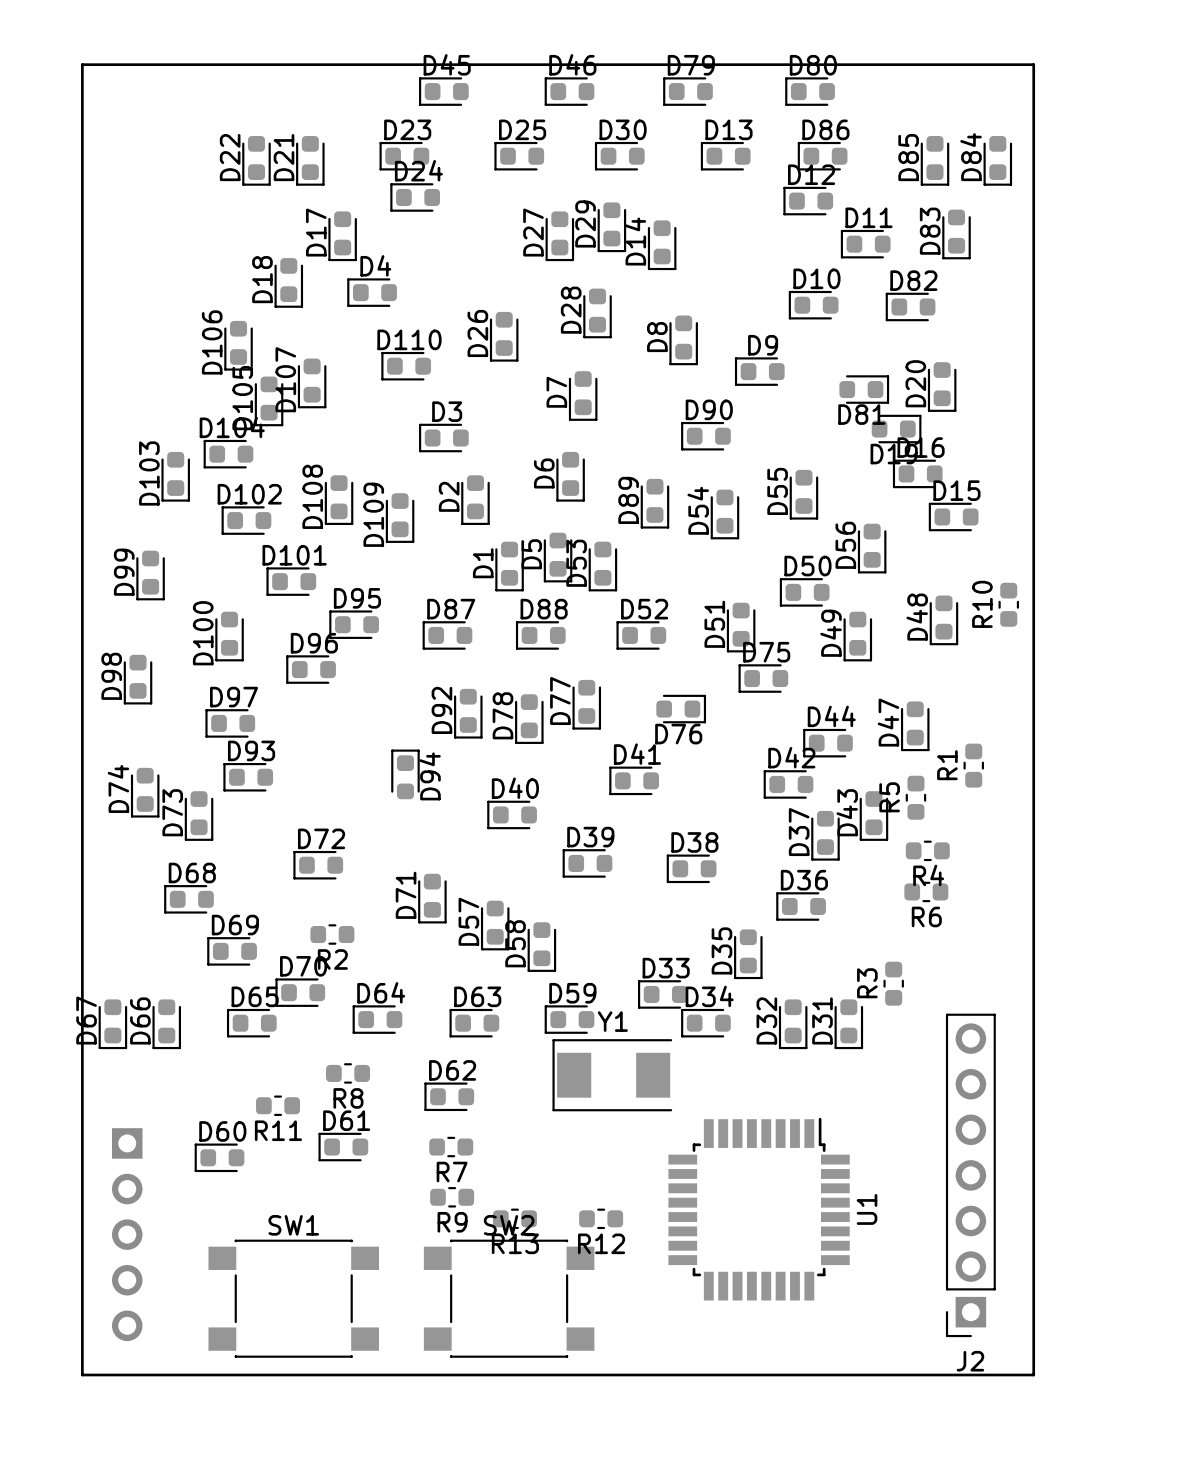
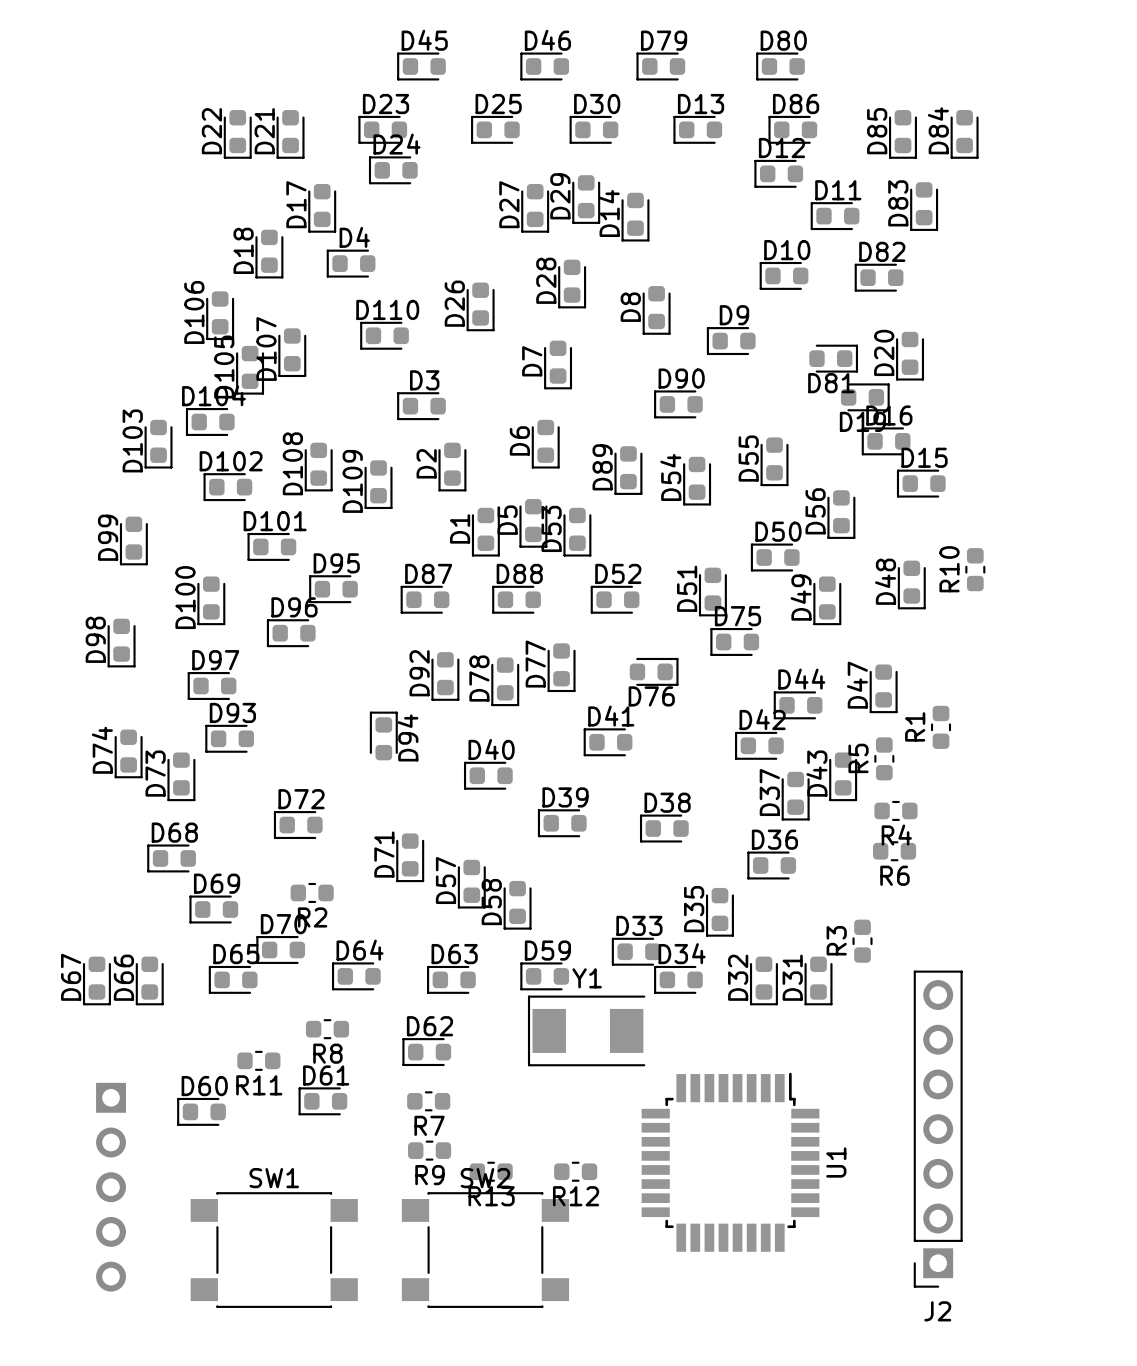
board edge: (82, 64) (1033, 64) (1033, 1374) (82, 1374) (82, 64) -> none

